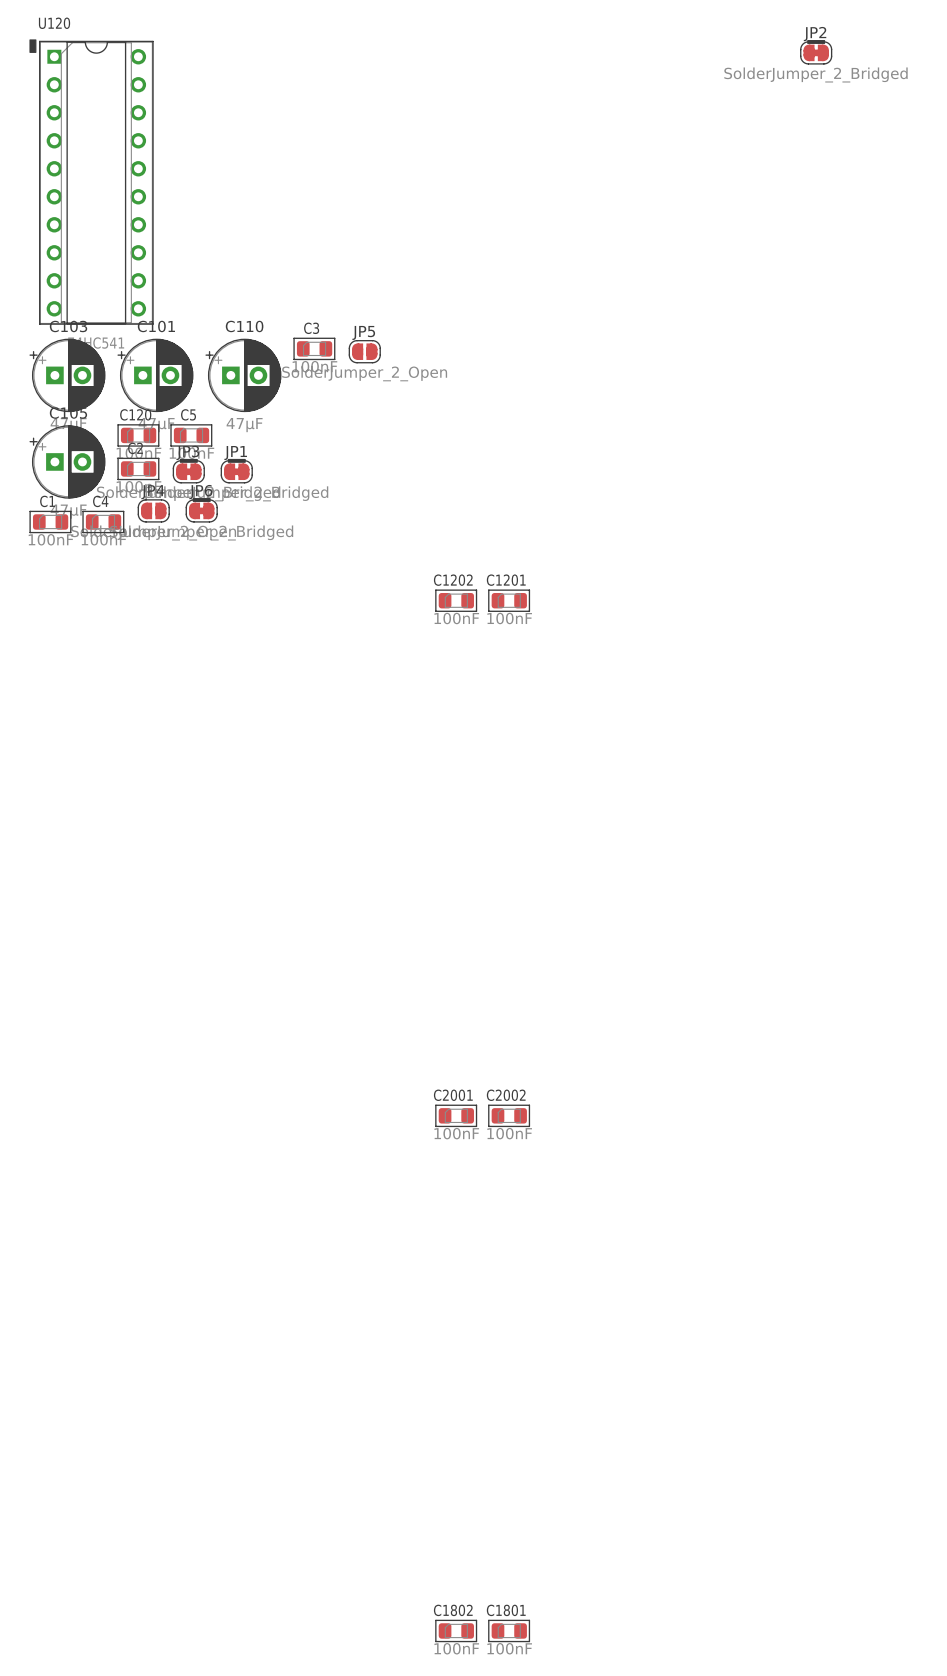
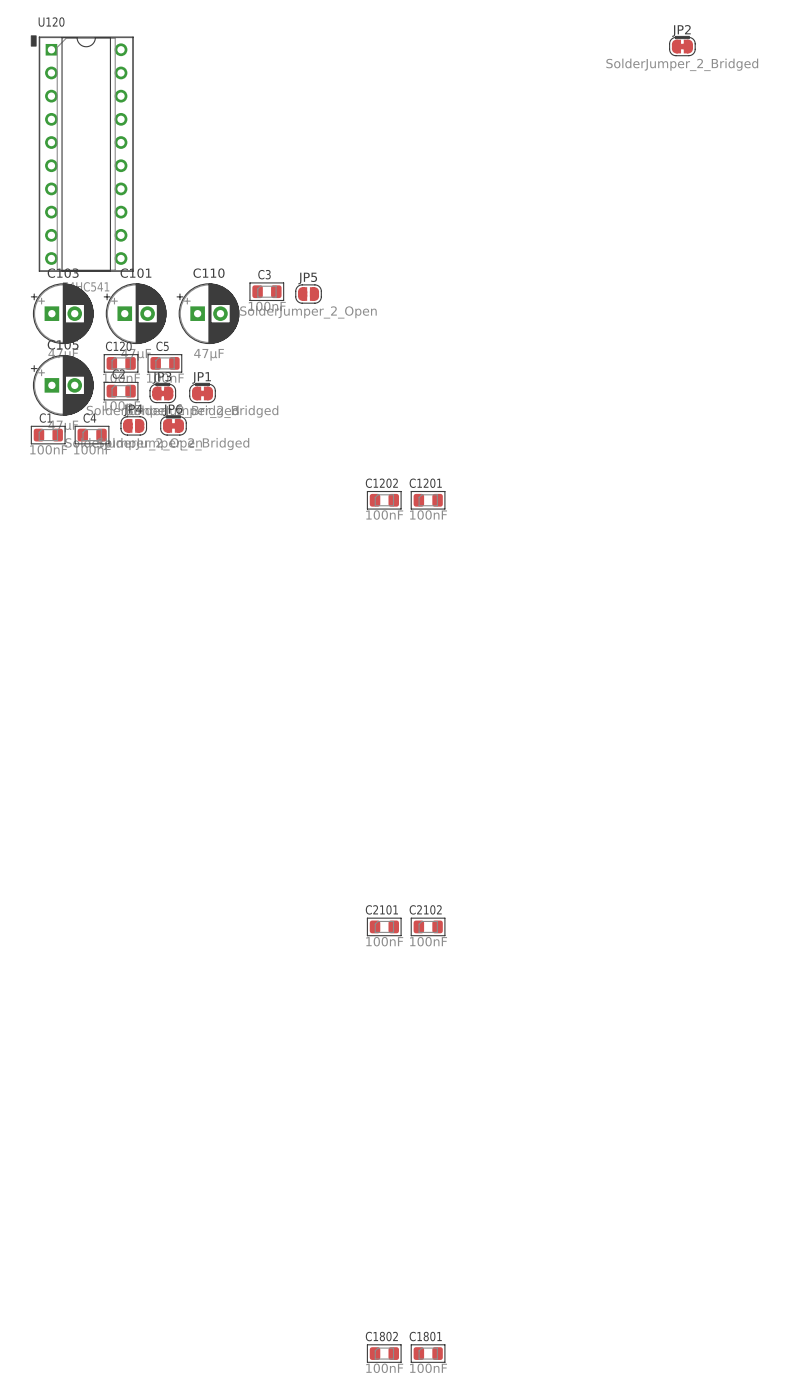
C2001 name: C2001 (453, 1095) -> C2101 (381, 909)
C2002 name: C2002 (506, 1095) -> C2102 (425, 909)

